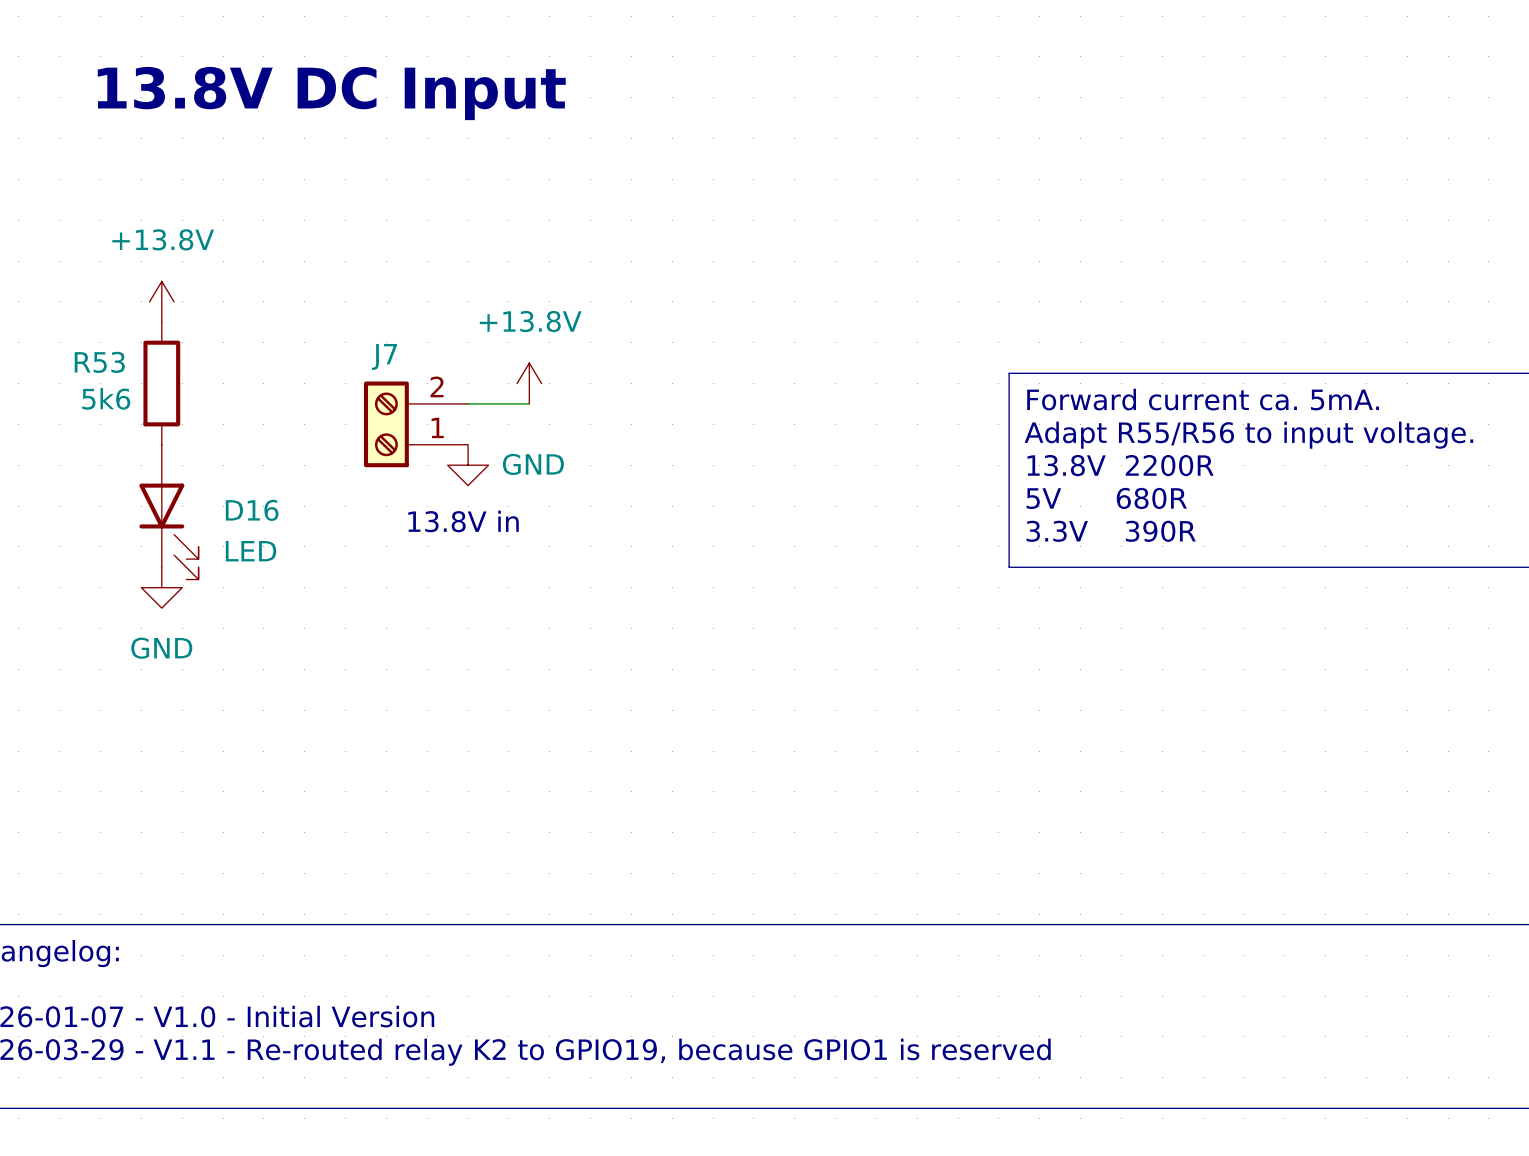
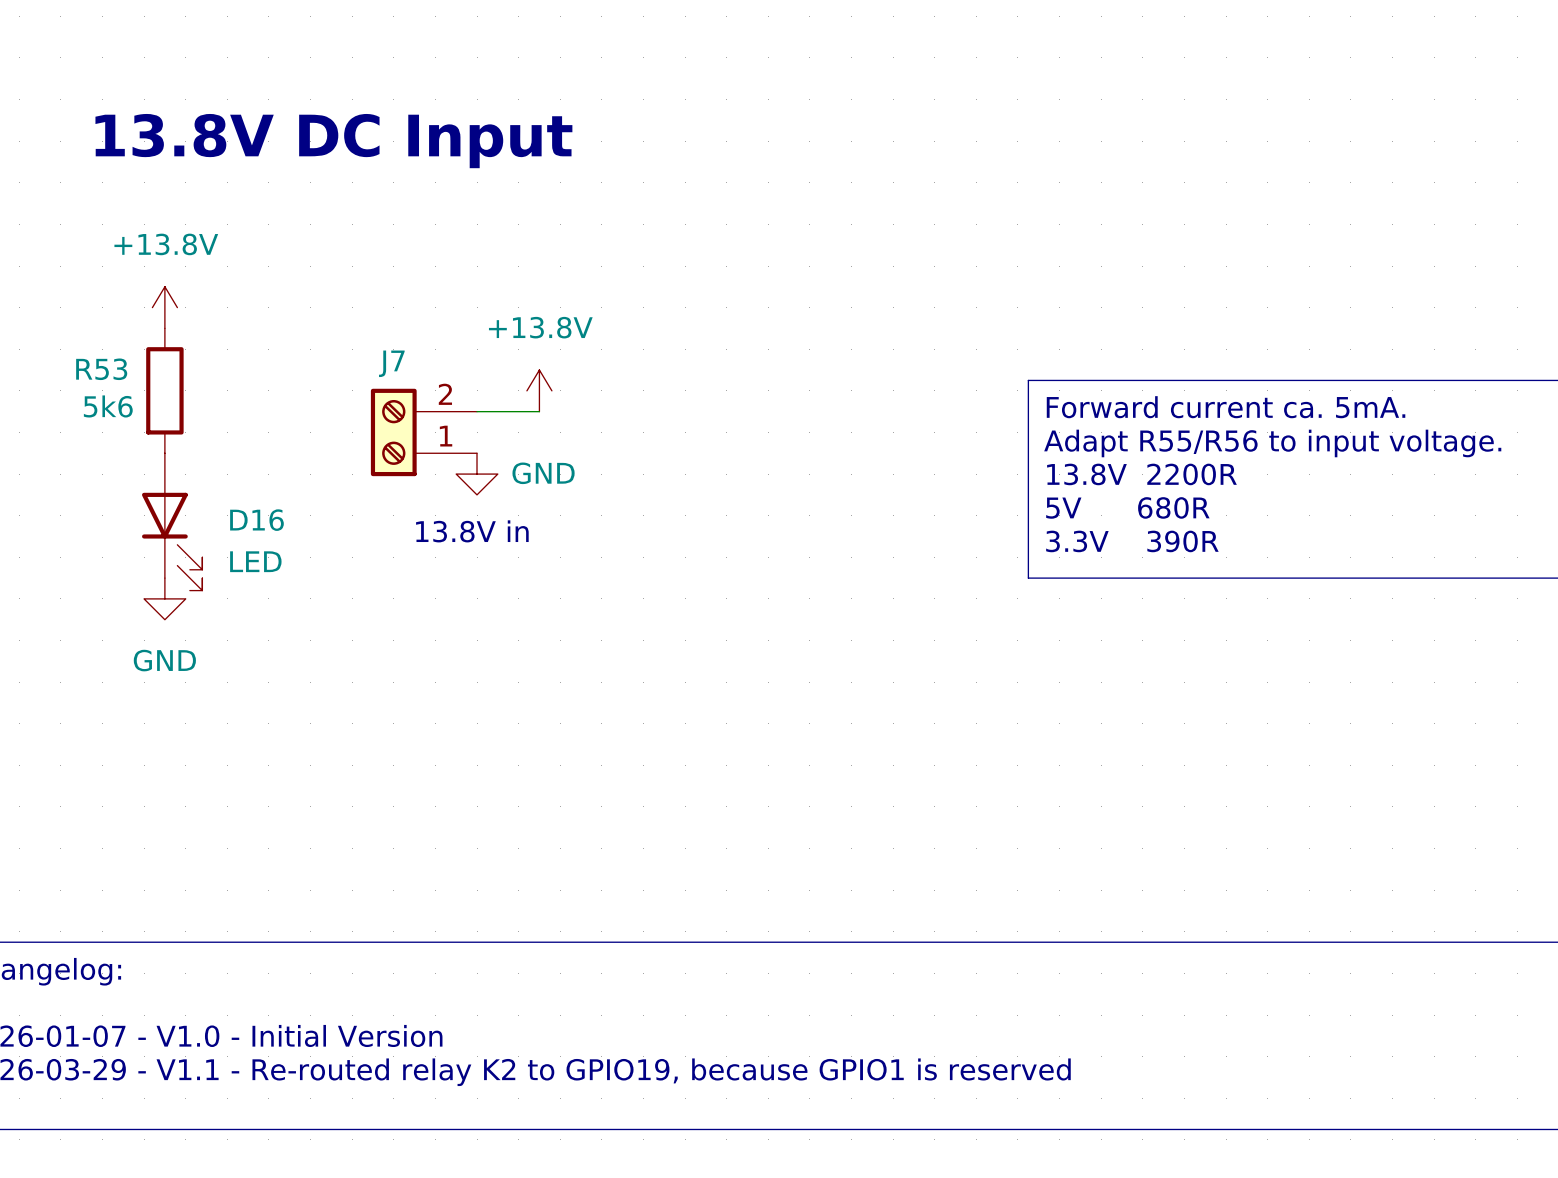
text position: 13.8V DC Input (331, 93) -> 13.8V DC Input (333, 141)

